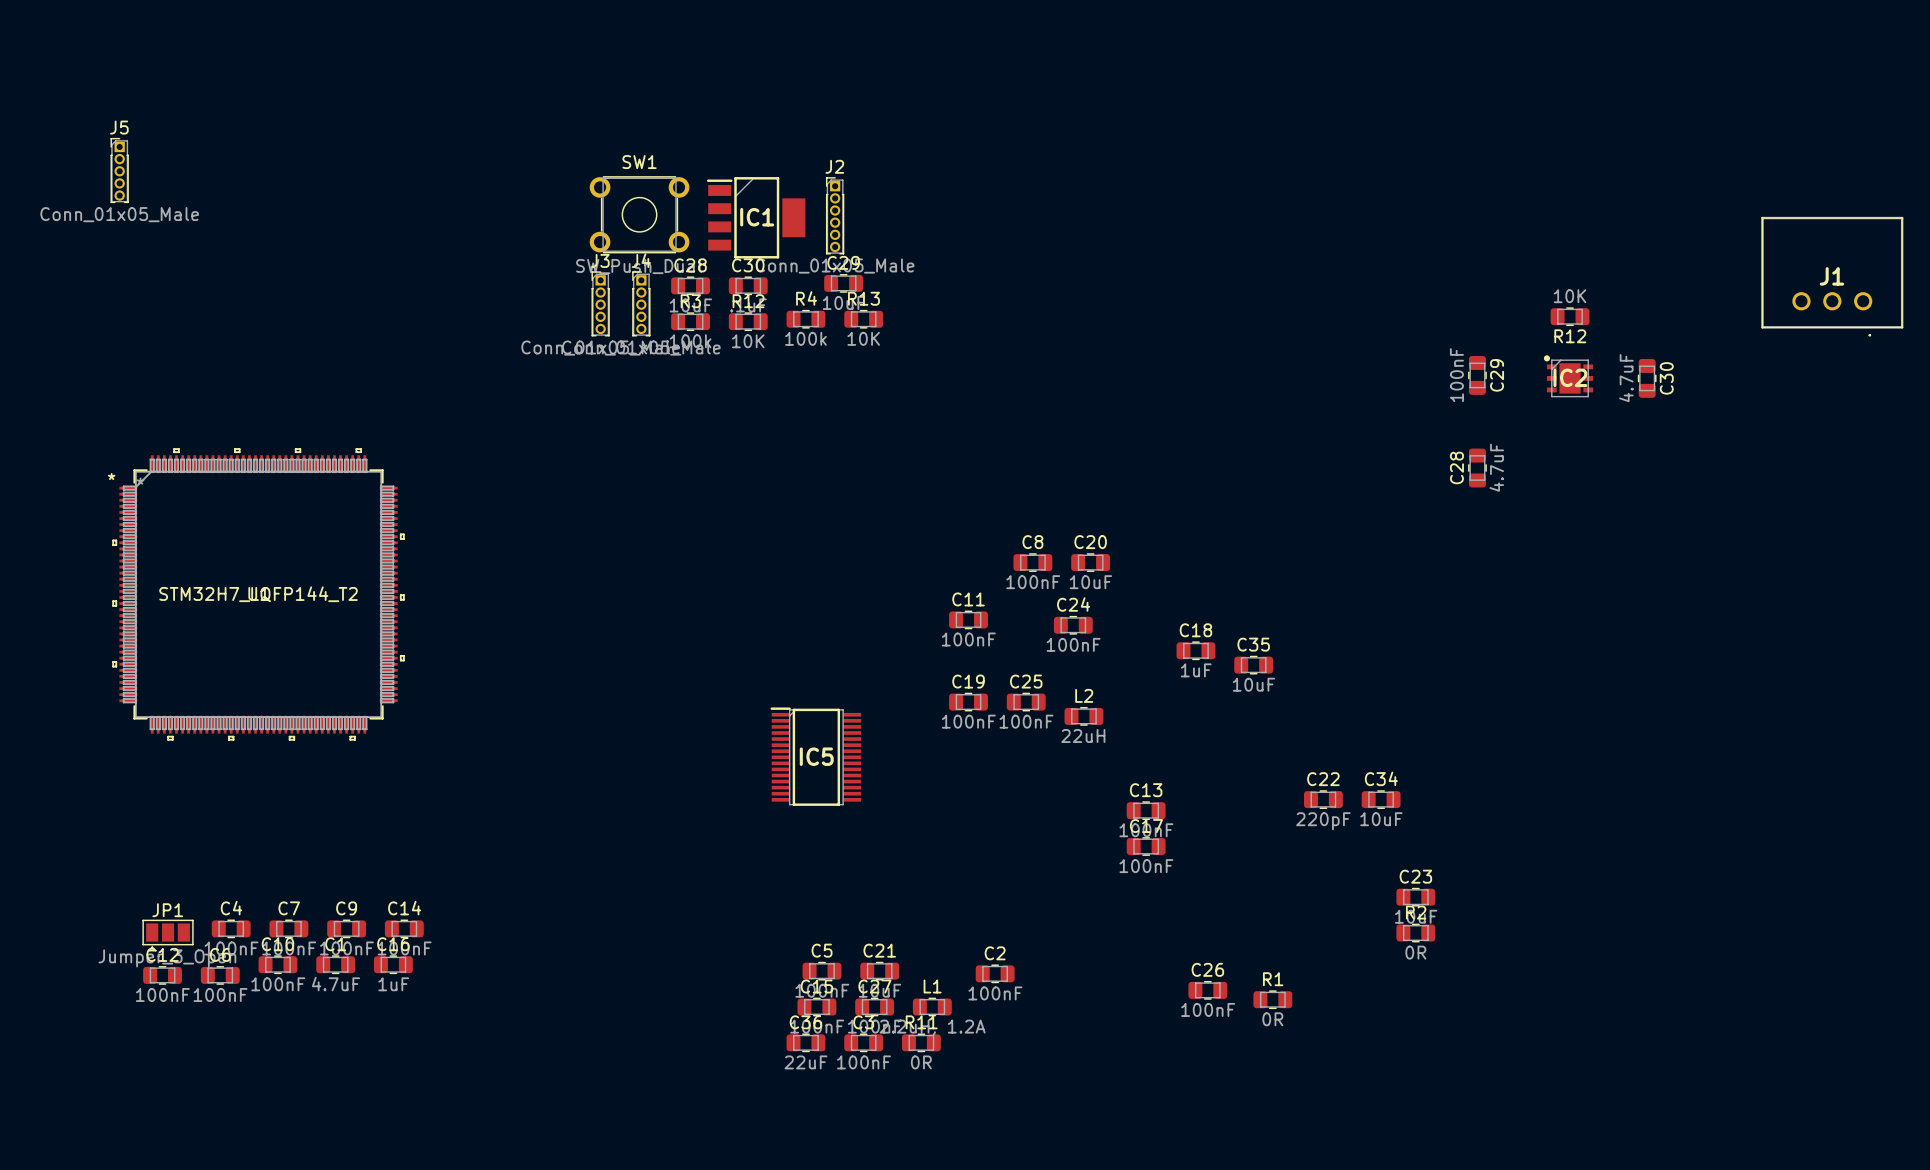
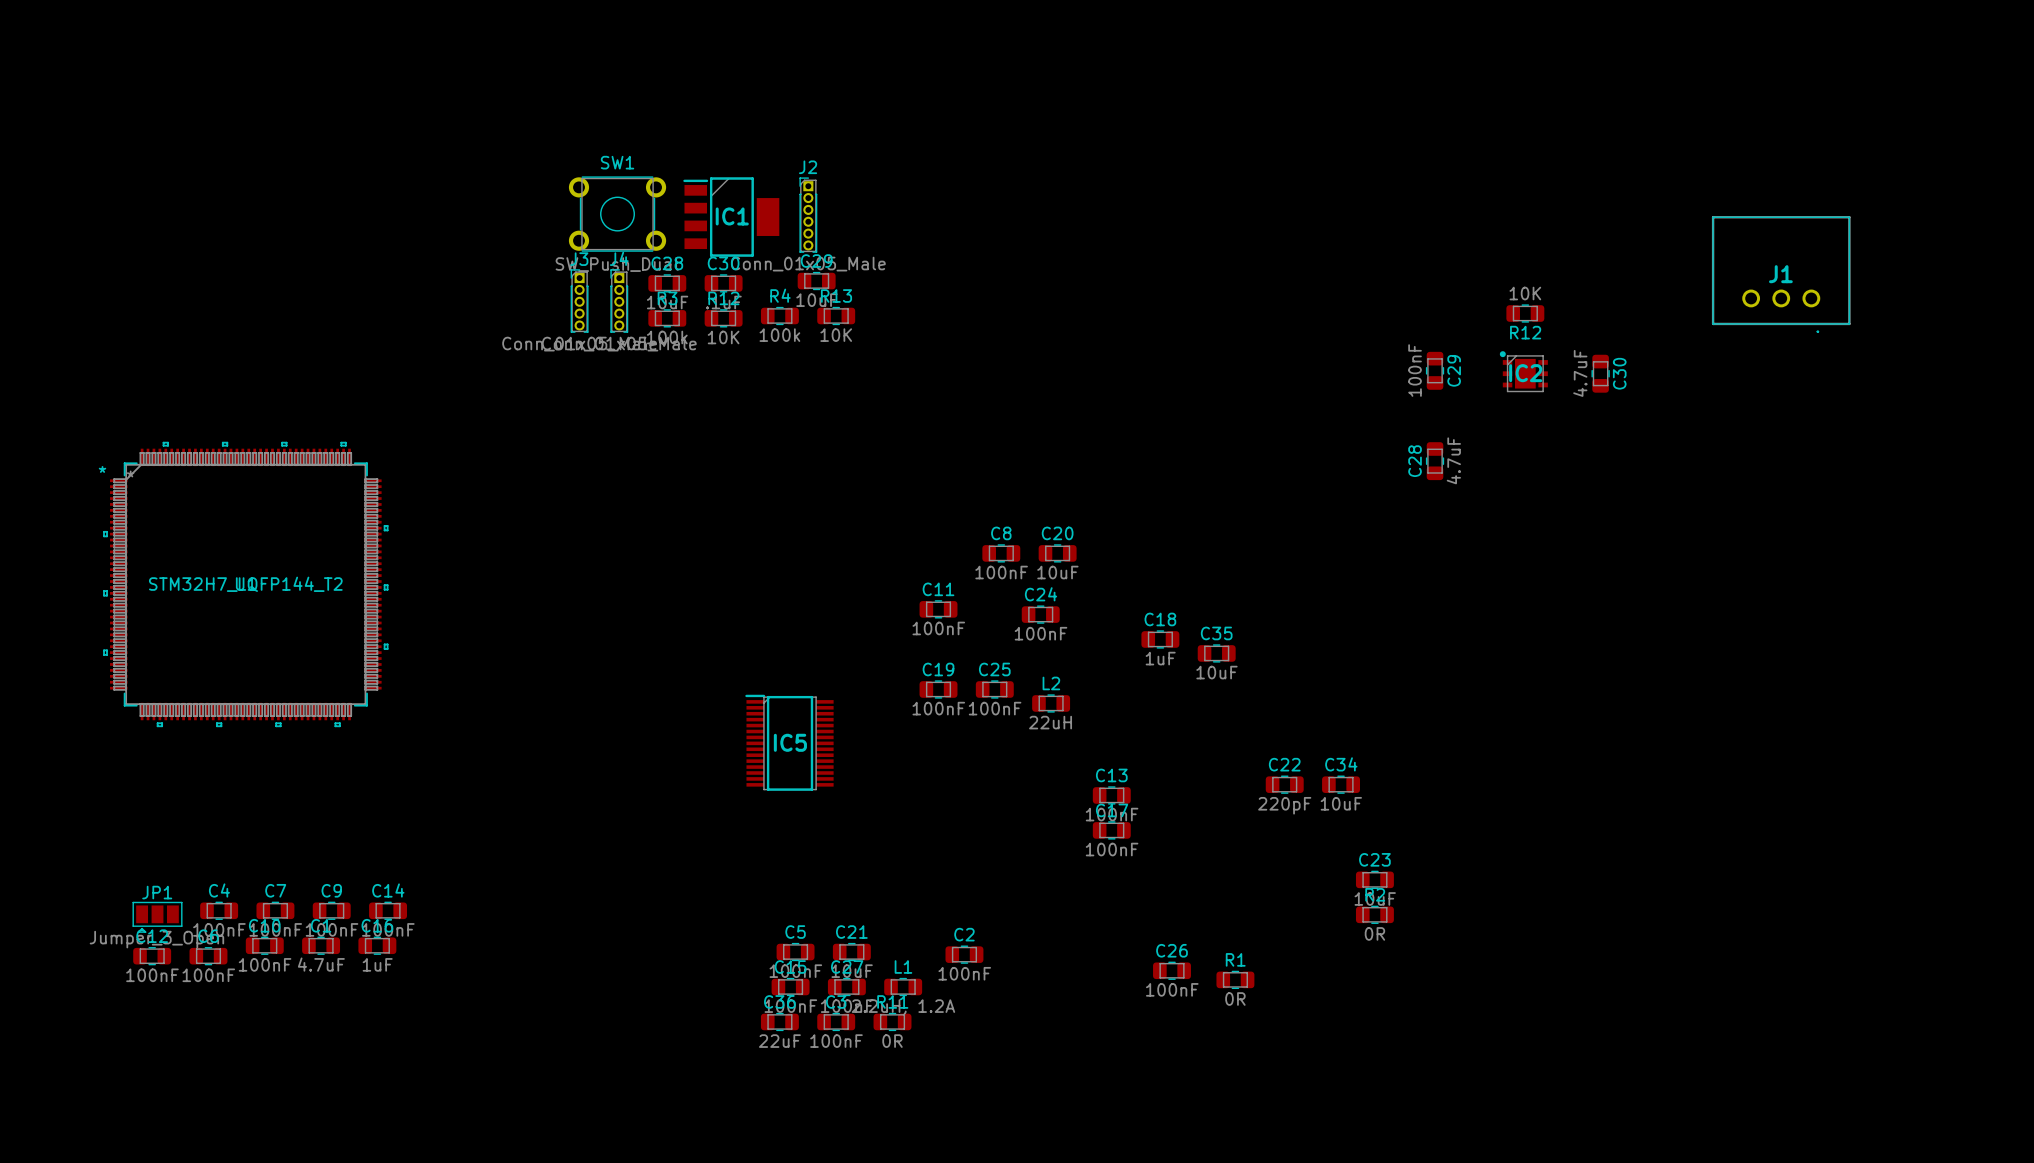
J5: Conn_01x05_Male (119, 170) -> none

